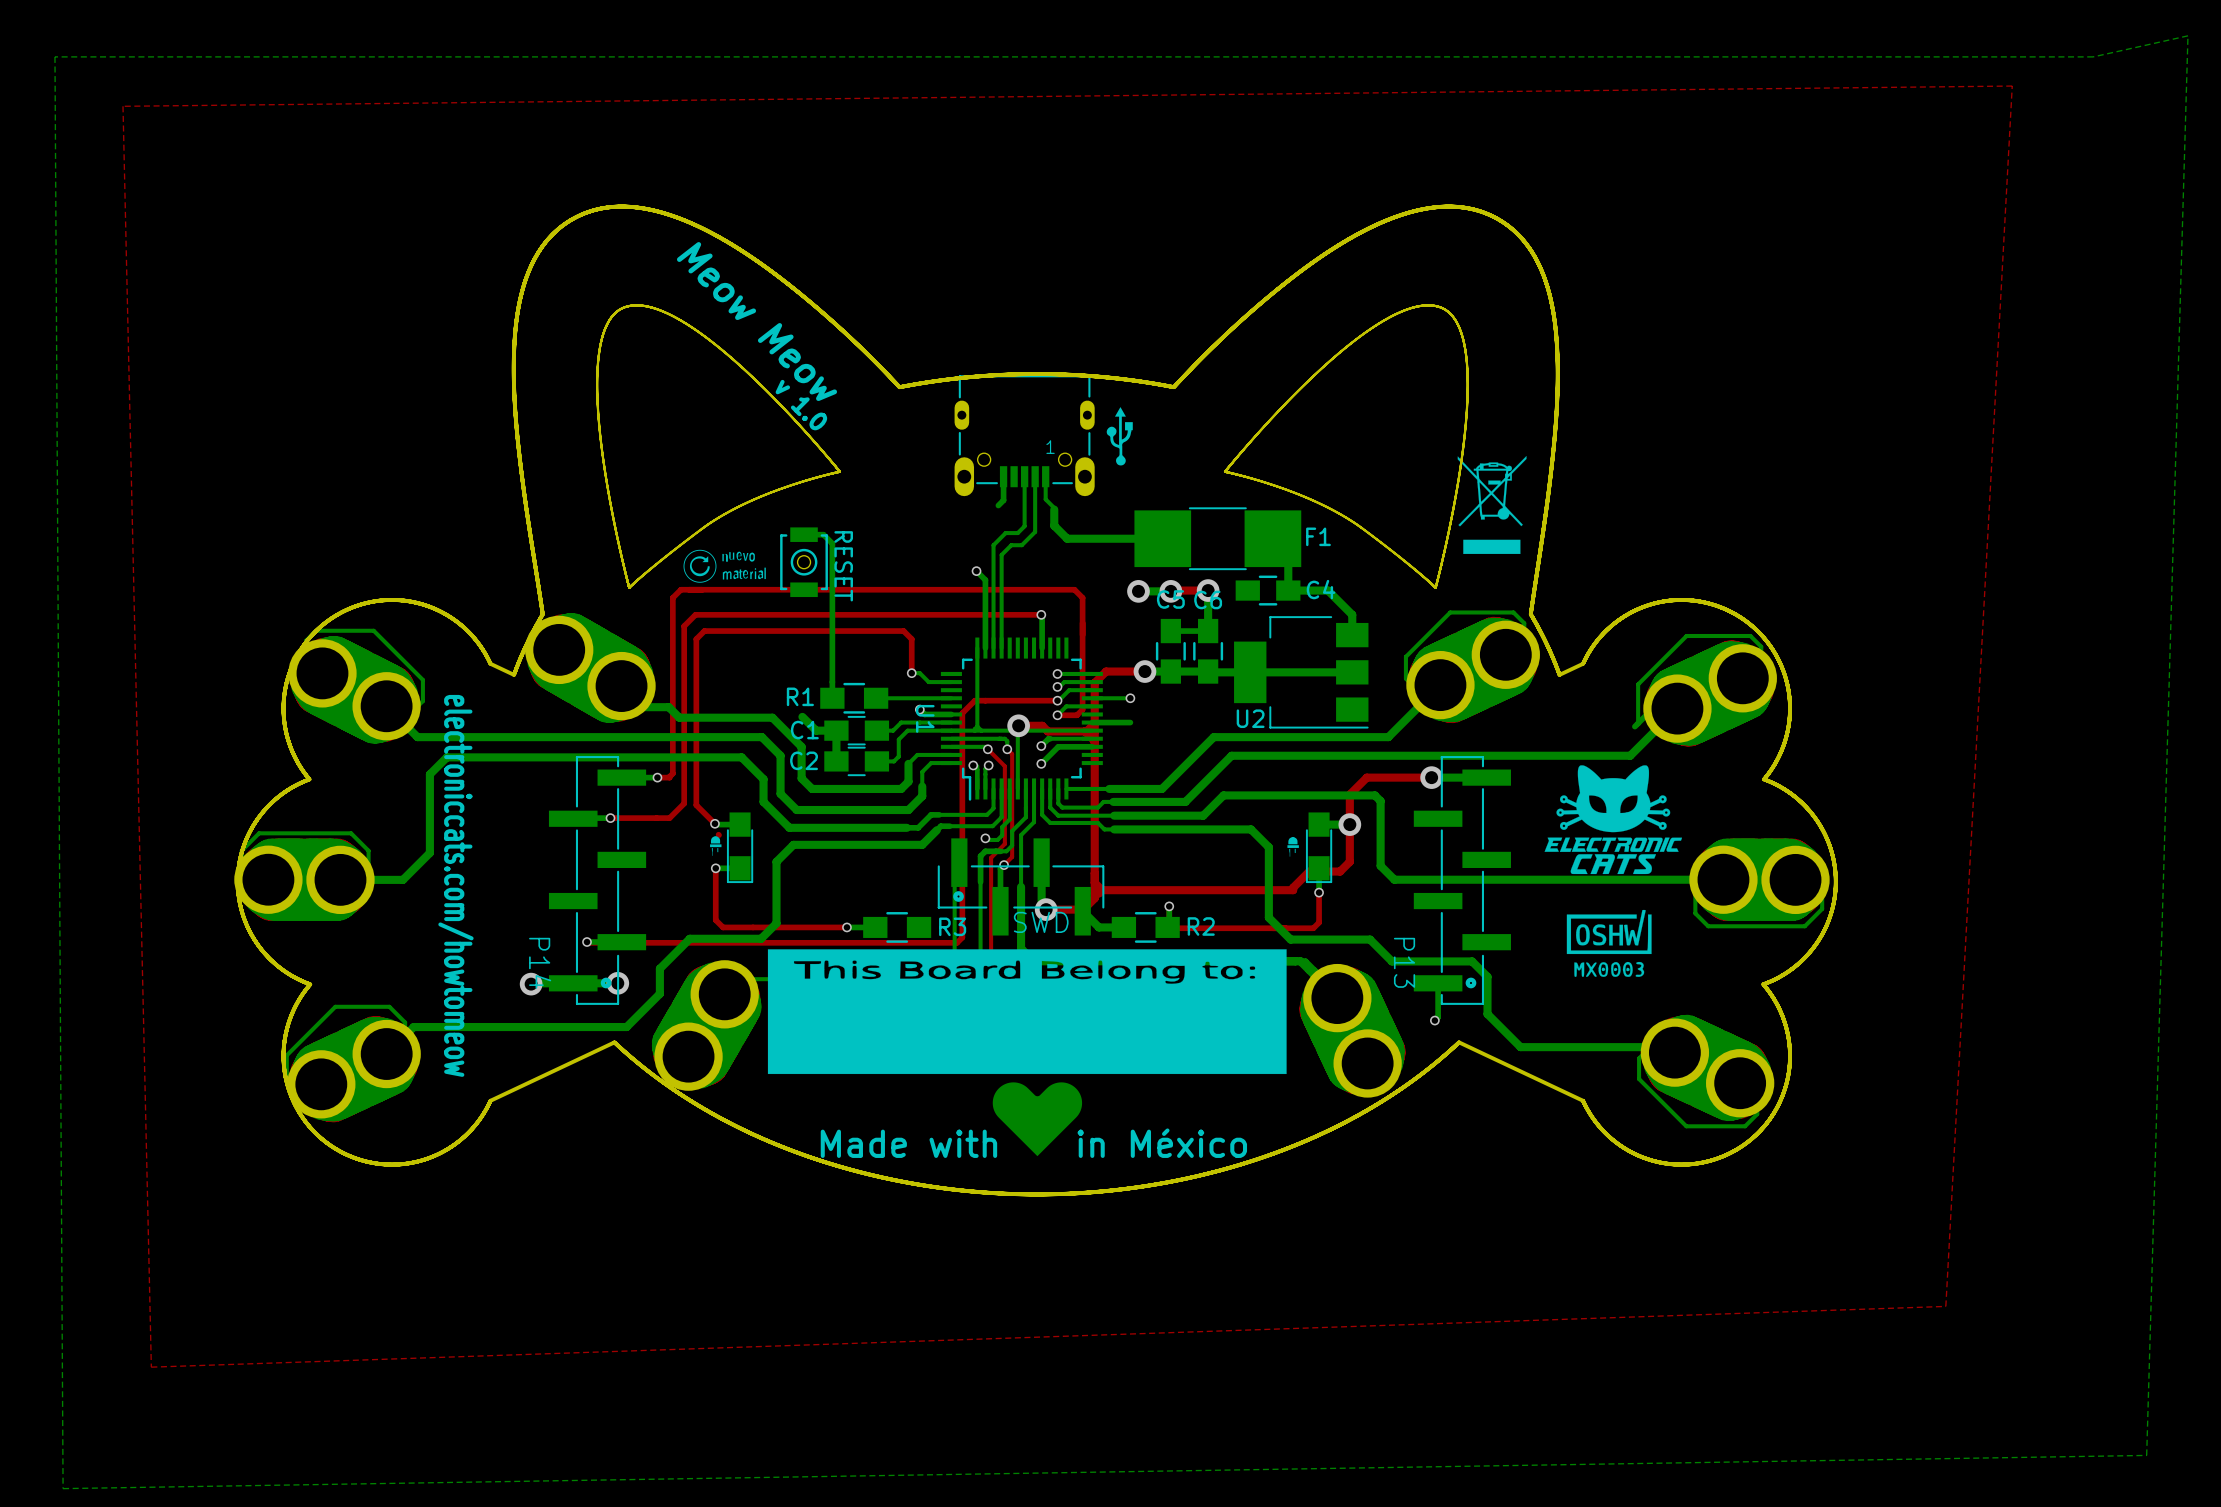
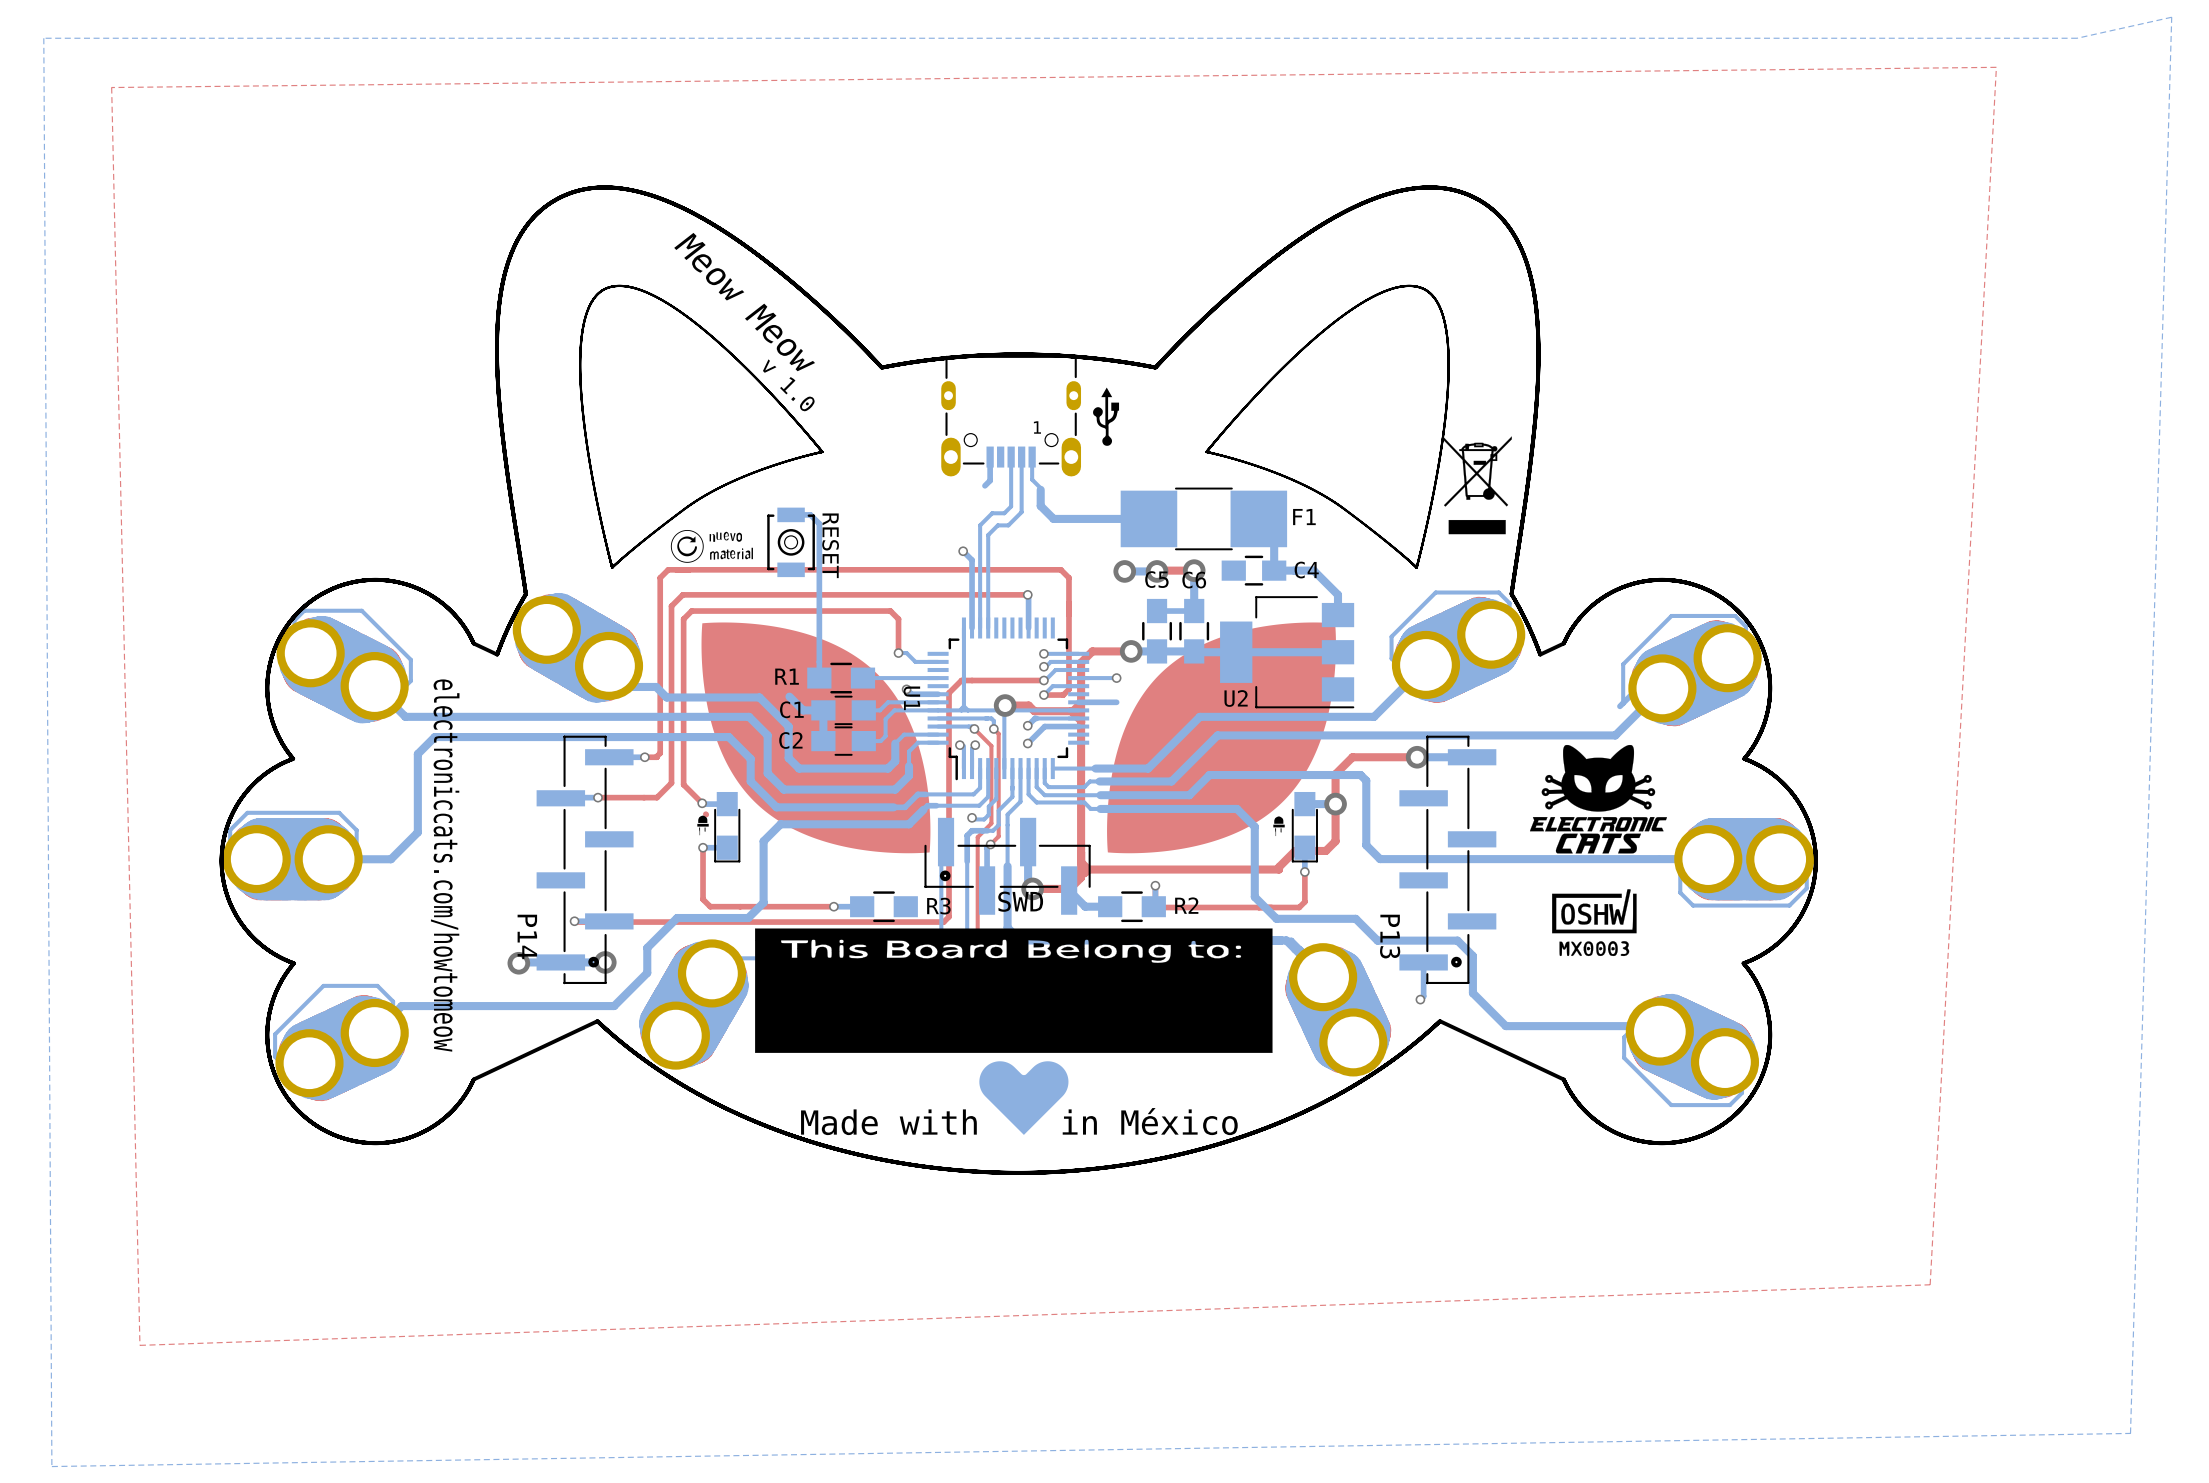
drawing shape: [235, 204, 1838, 1197] -> [219, 185, 1818, 1175]

